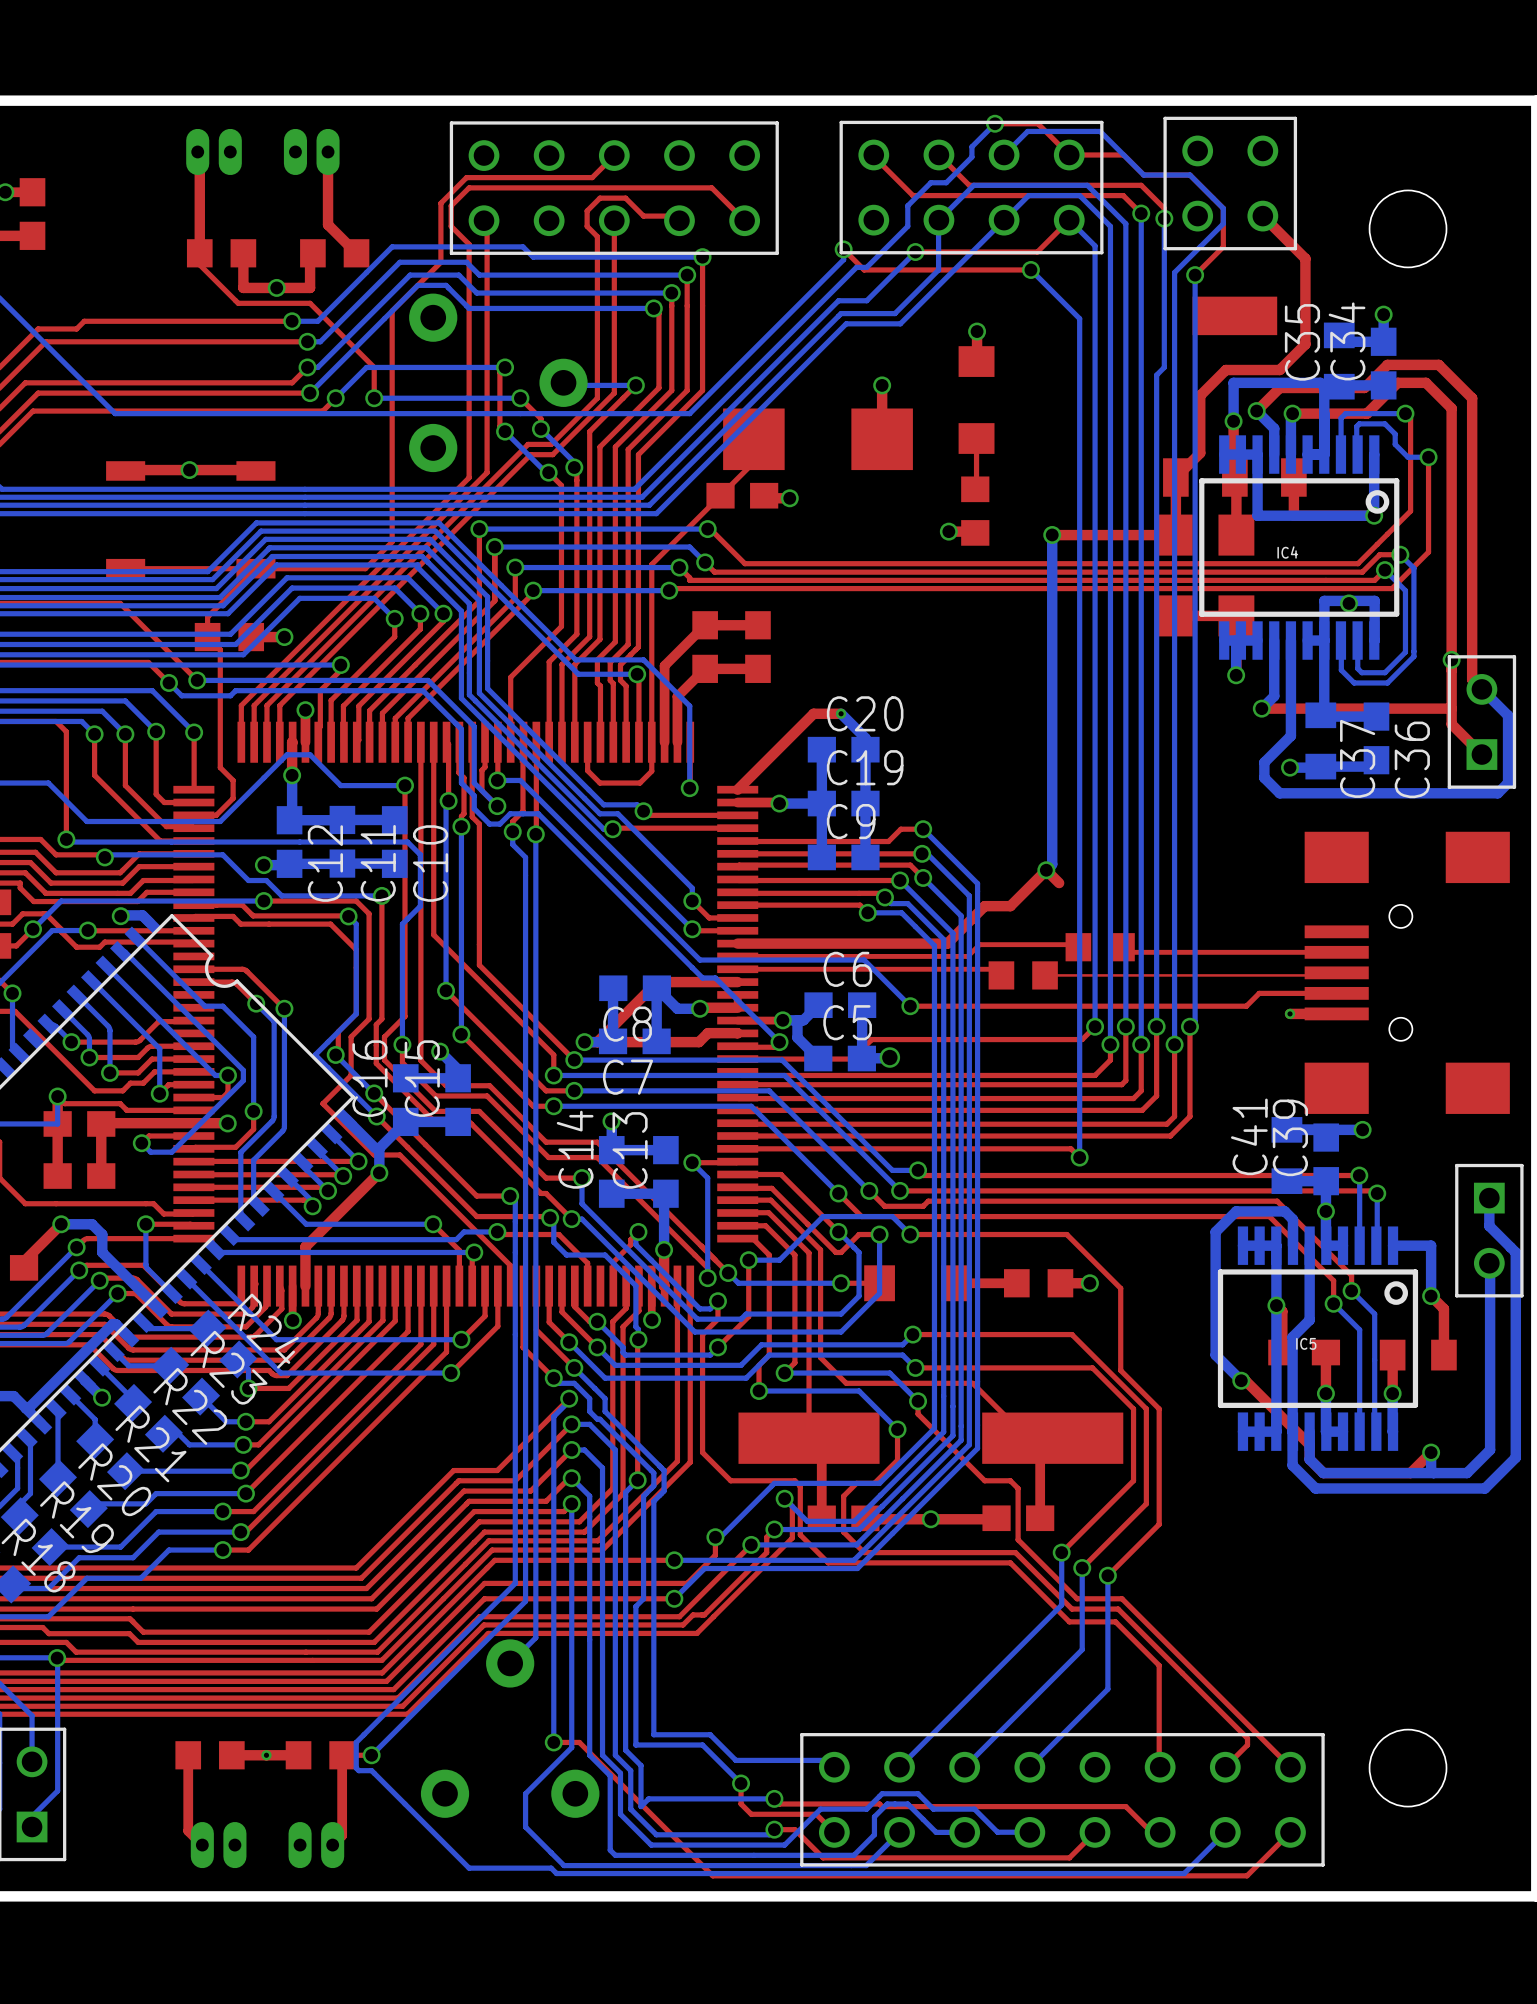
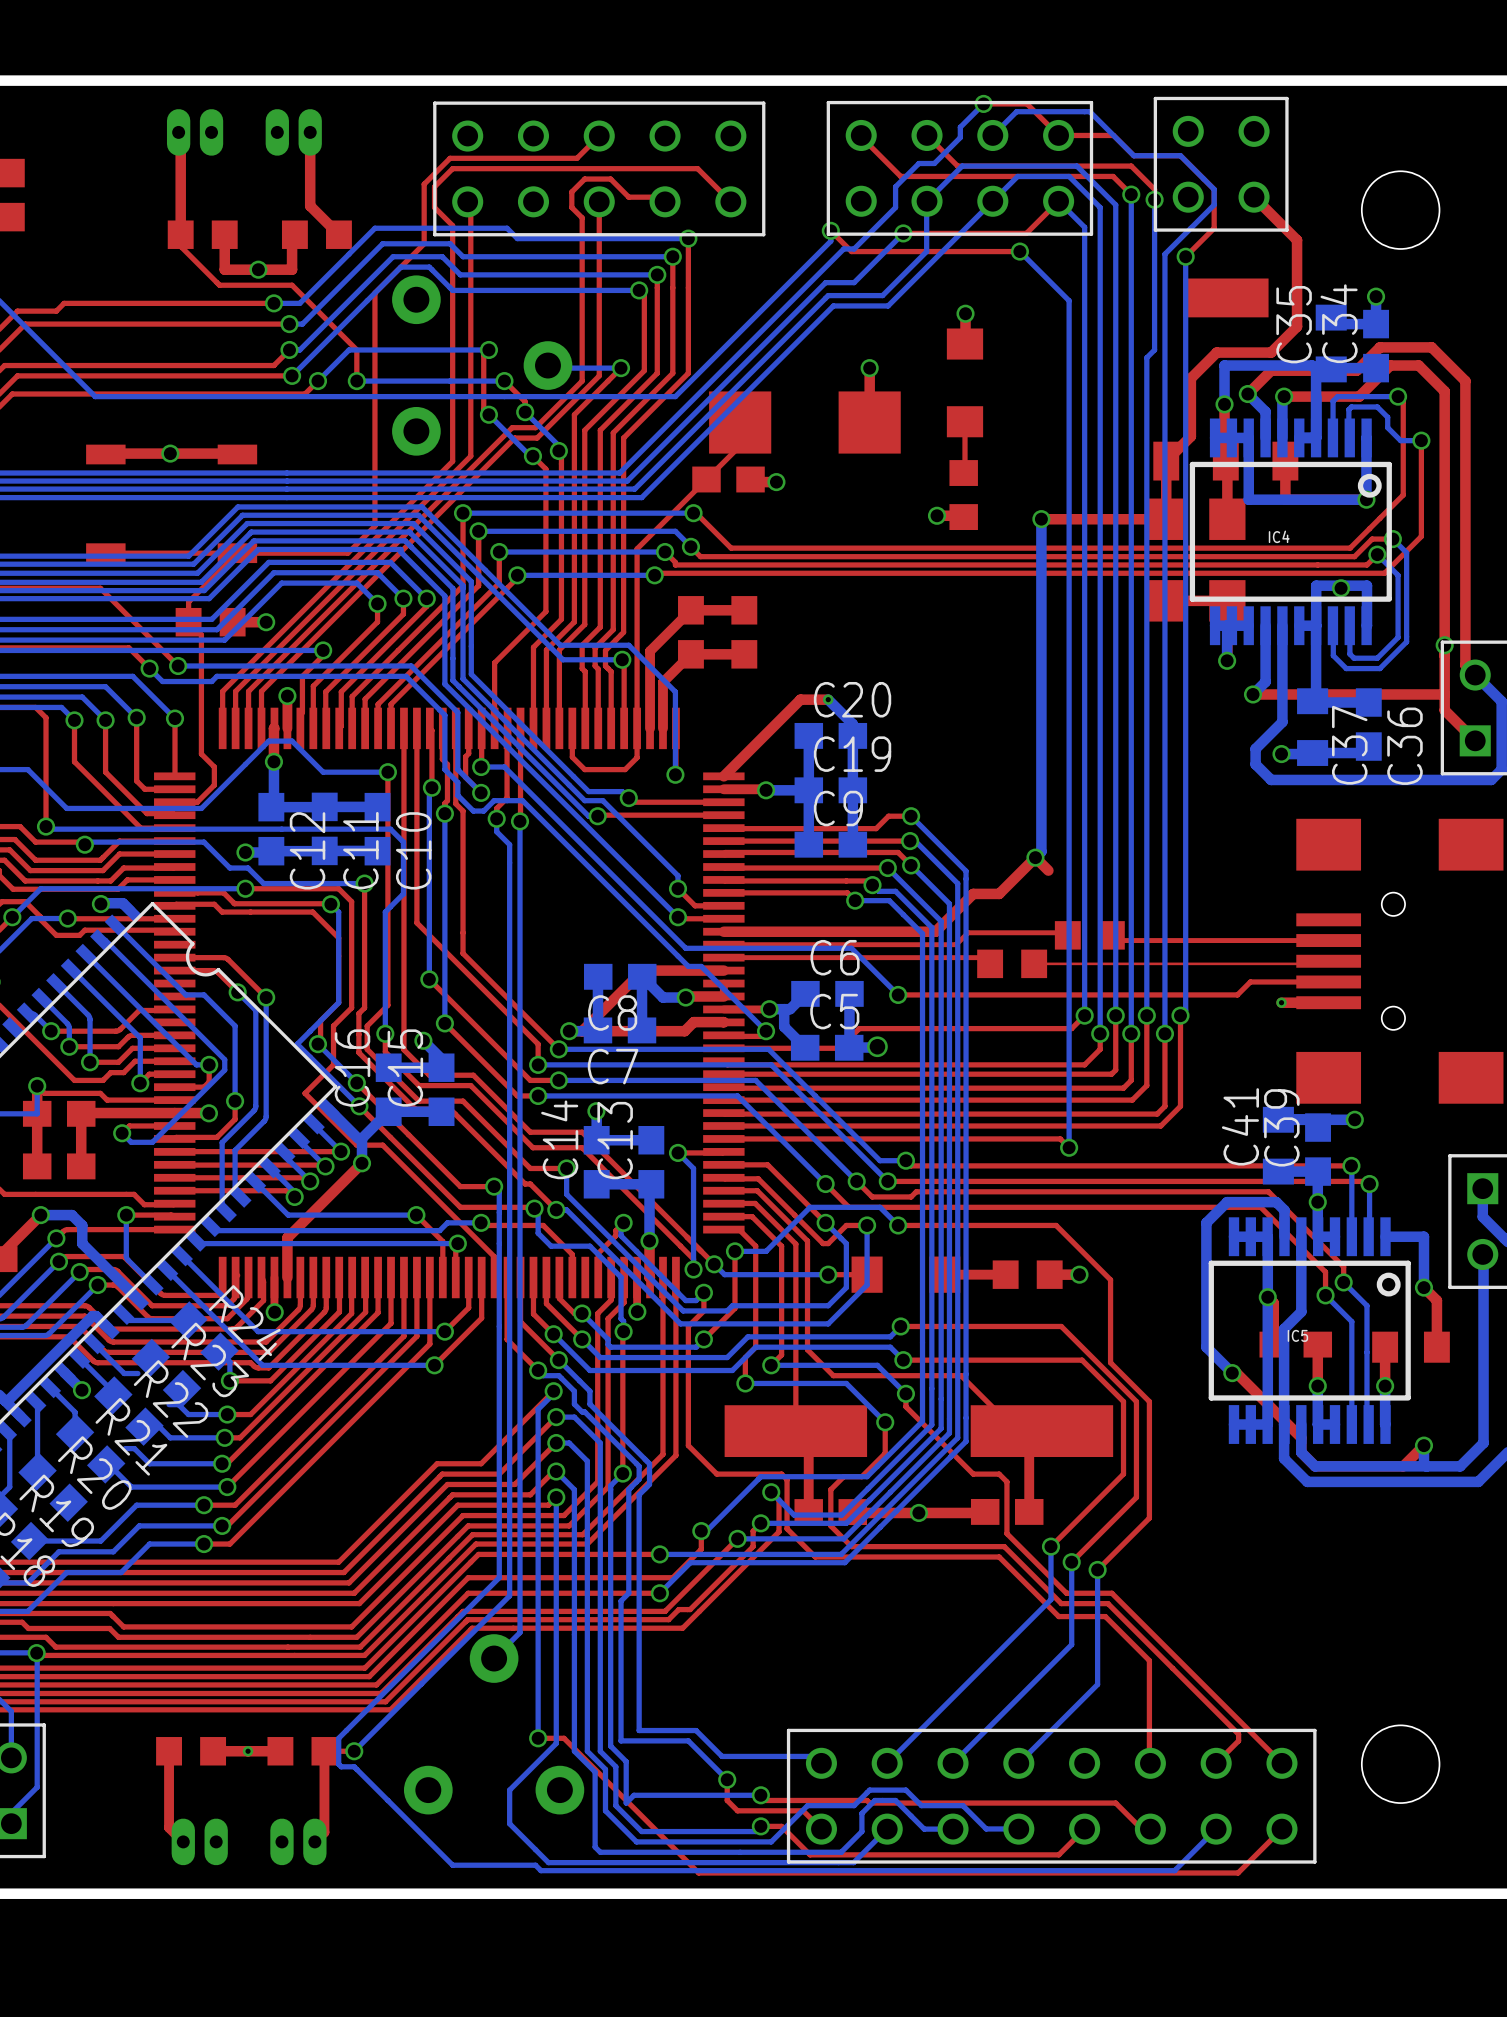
bottom track: (170, 1365) (128, 1365) -> (137, 1373) (124, 1373) (108, 1357)
bottom track: (201, 1396) (226, 1421) -> (169, 1404) (178, 1404) (188, 1414) (207, 1414)
bottom track: (240, 1470) (125, 1471) -> (222, 1463) (149, 1463) (134, 1448) (125, 1448)
bottom track: (156, 1493) (145, 1503) (94, 1503) (88, 1509) -> (136, 1487) (131, 1487) (115, 1470) (103, 1470)

